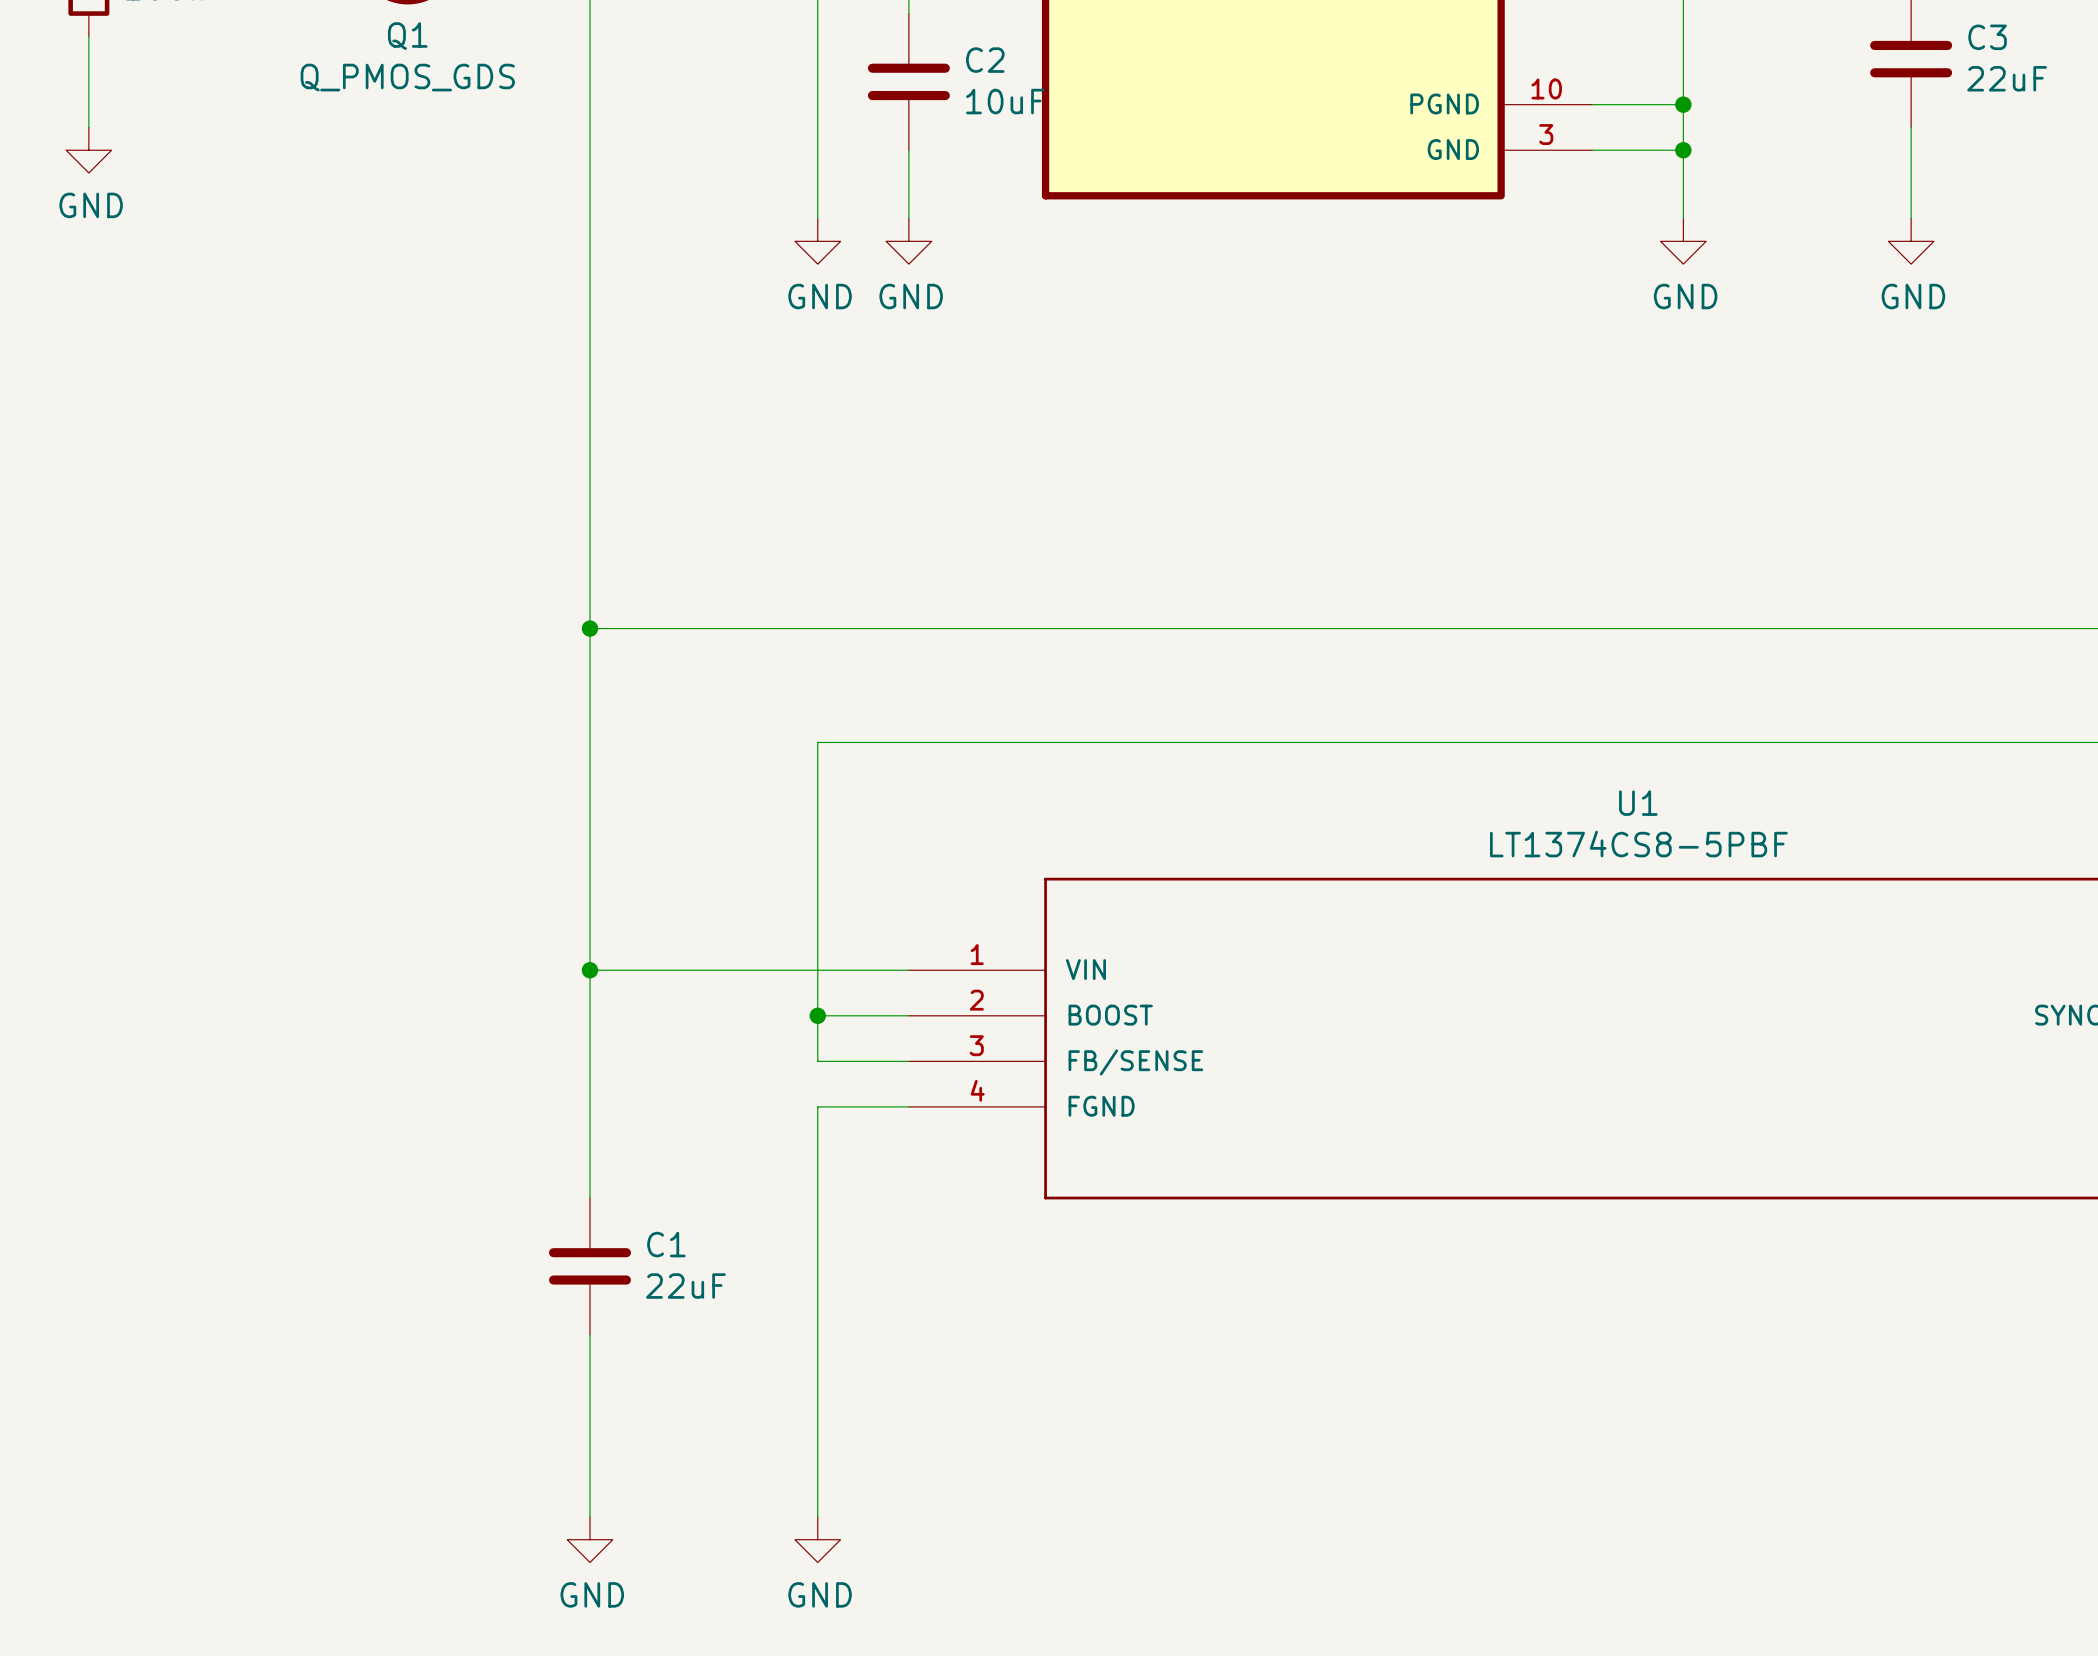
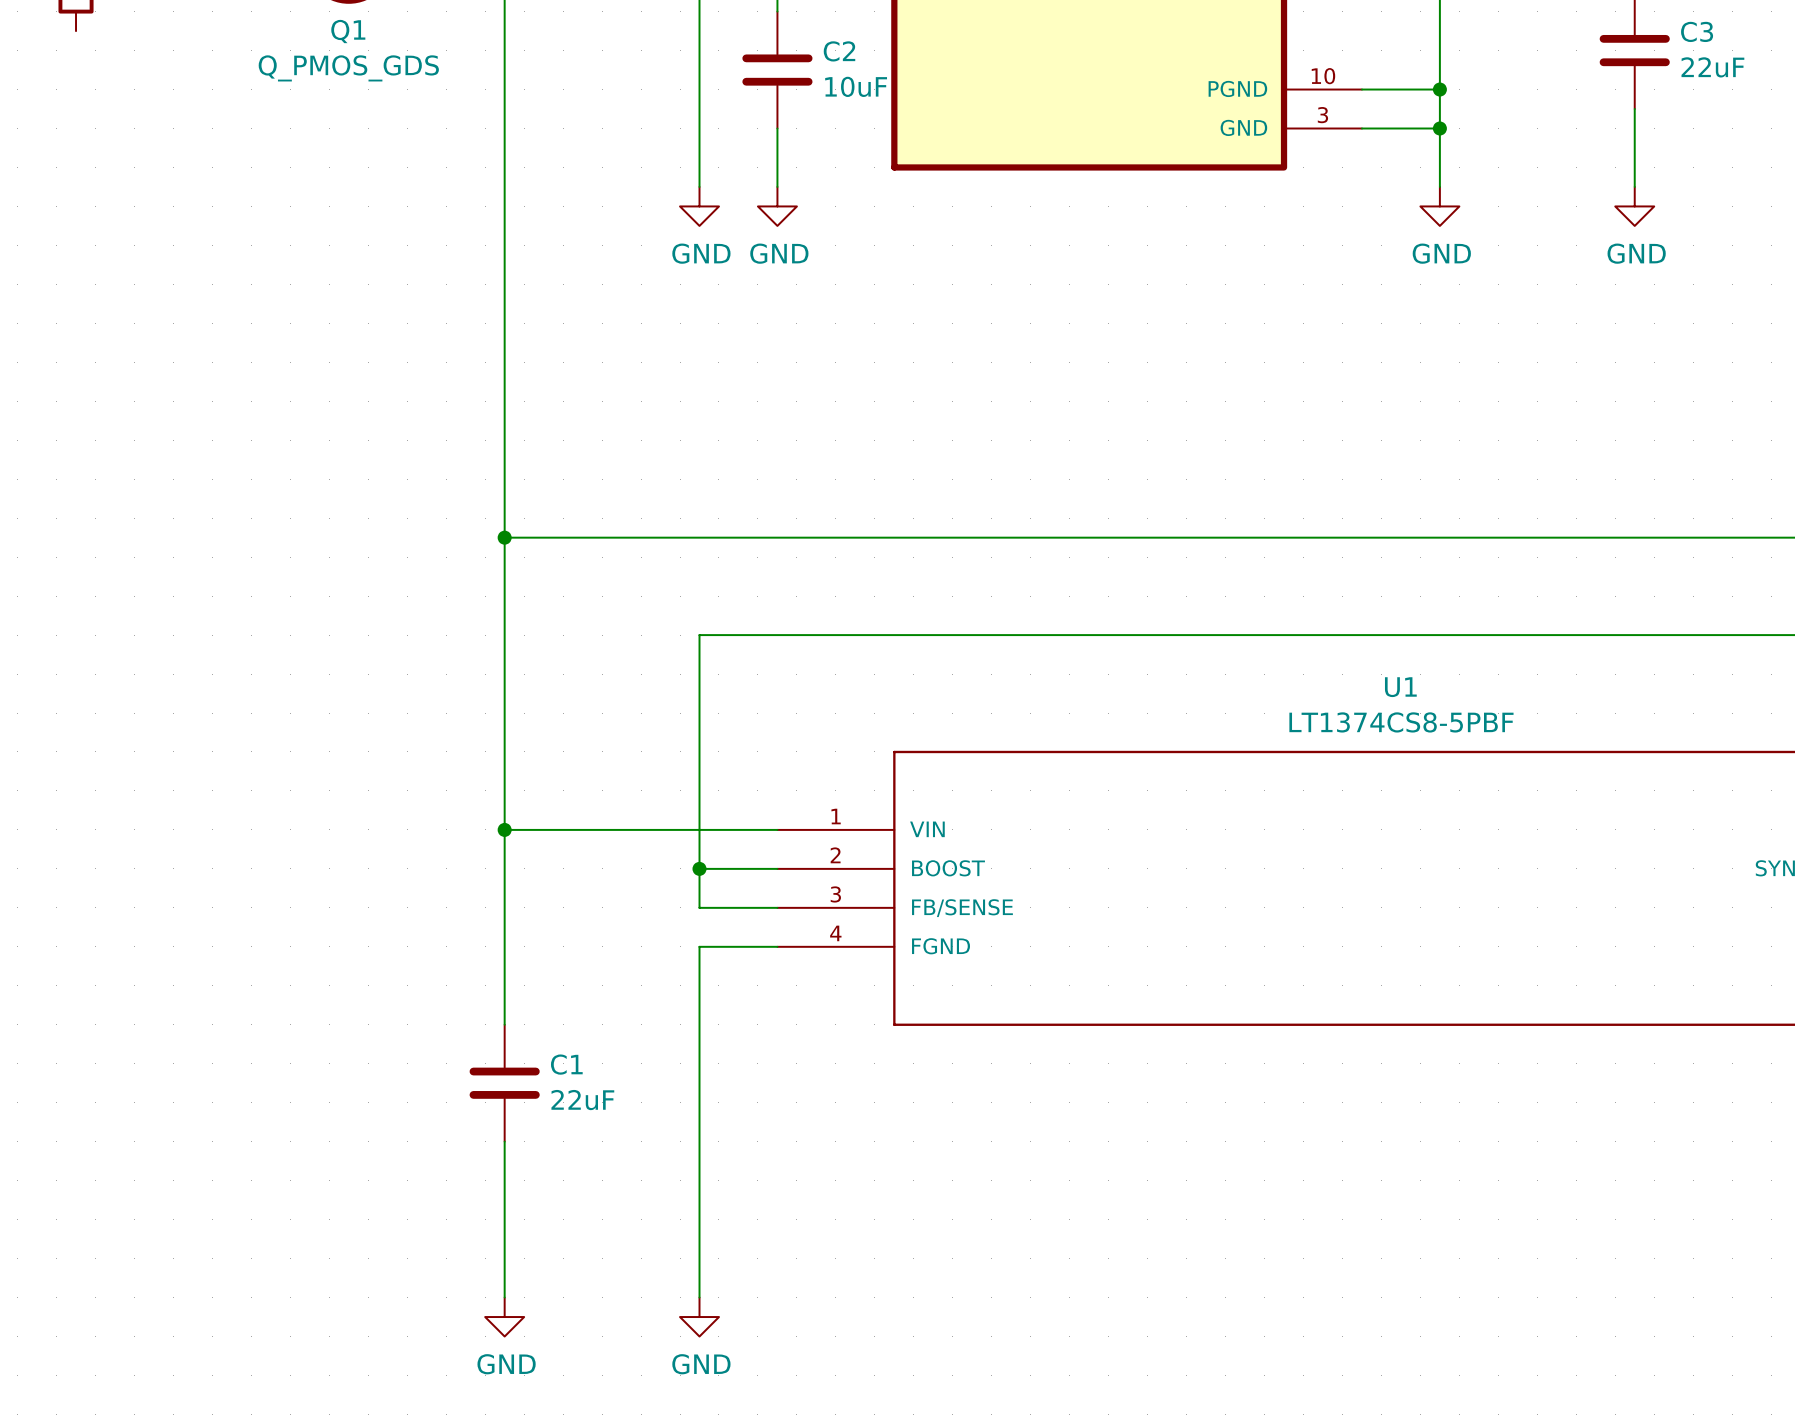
wire: (88, 36) (88, 127) -> none
power symbol: GND (88, 150) -> none

